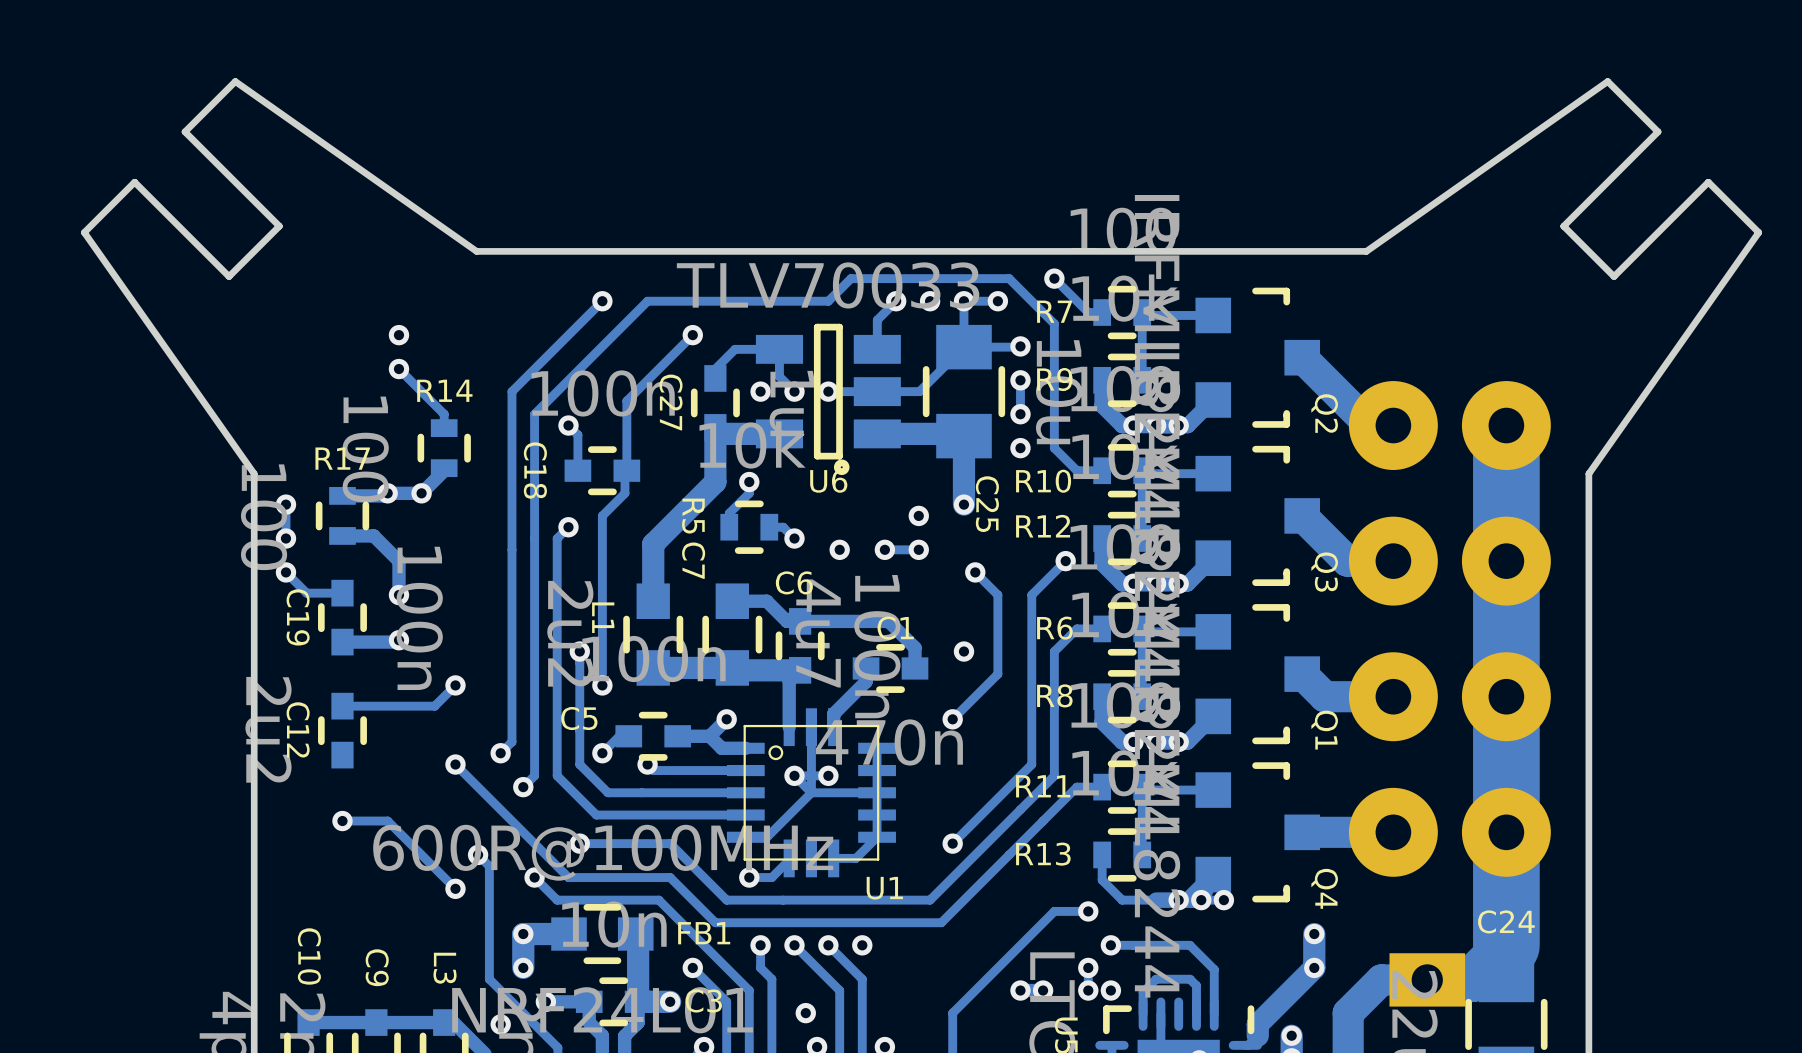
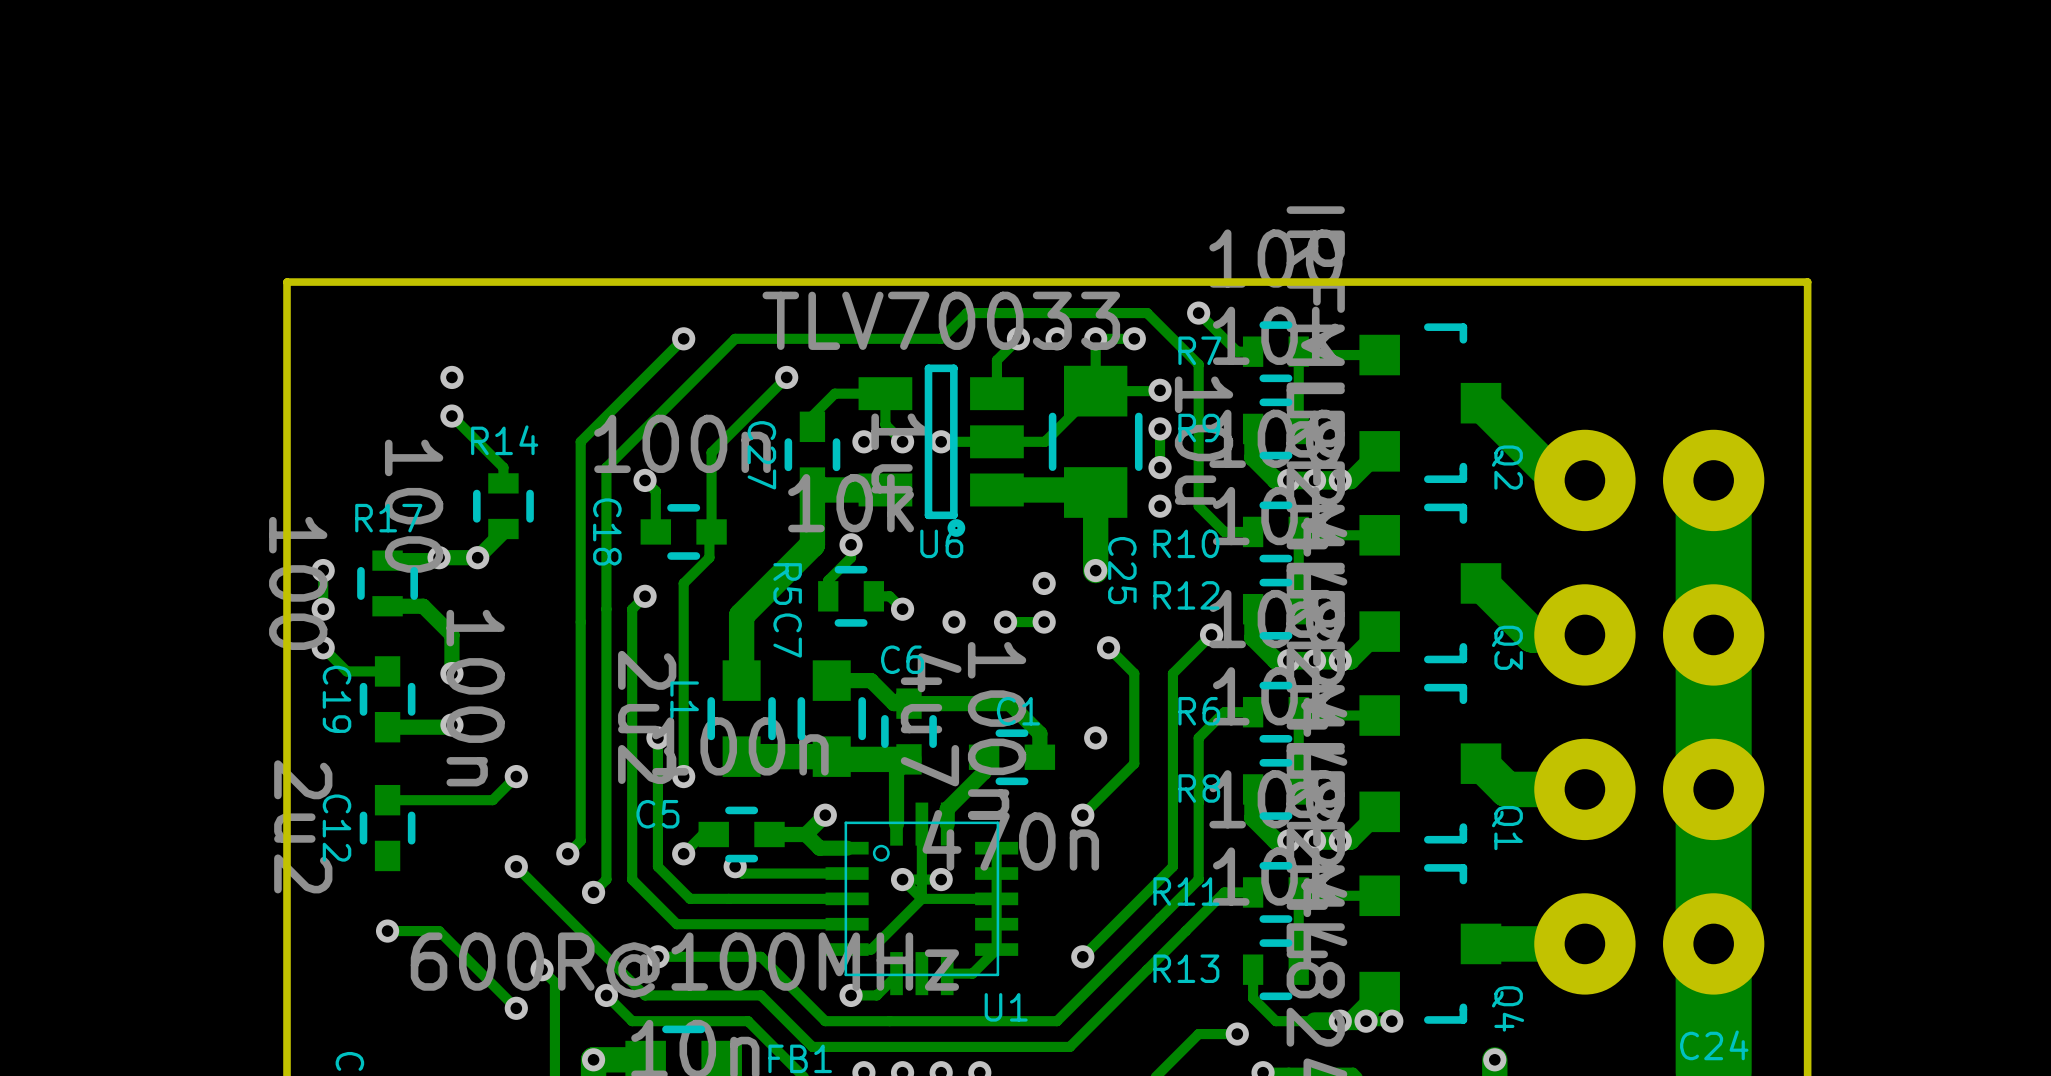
board edge: (476, 251) (235, 81) (185, 131) (279, 226) (229, 276) (134, 182) (84, 232) (254, 473) -> (540, 282) (287, 282) (287, 535)
board edge: (1366, 251) (1607, 81) (1658, 131) (1563, 226) (1614, 276) (1708, 182) (1758, 232) (1588, 473) -> (1554, 282) (1807, 282) (1807, 535)

